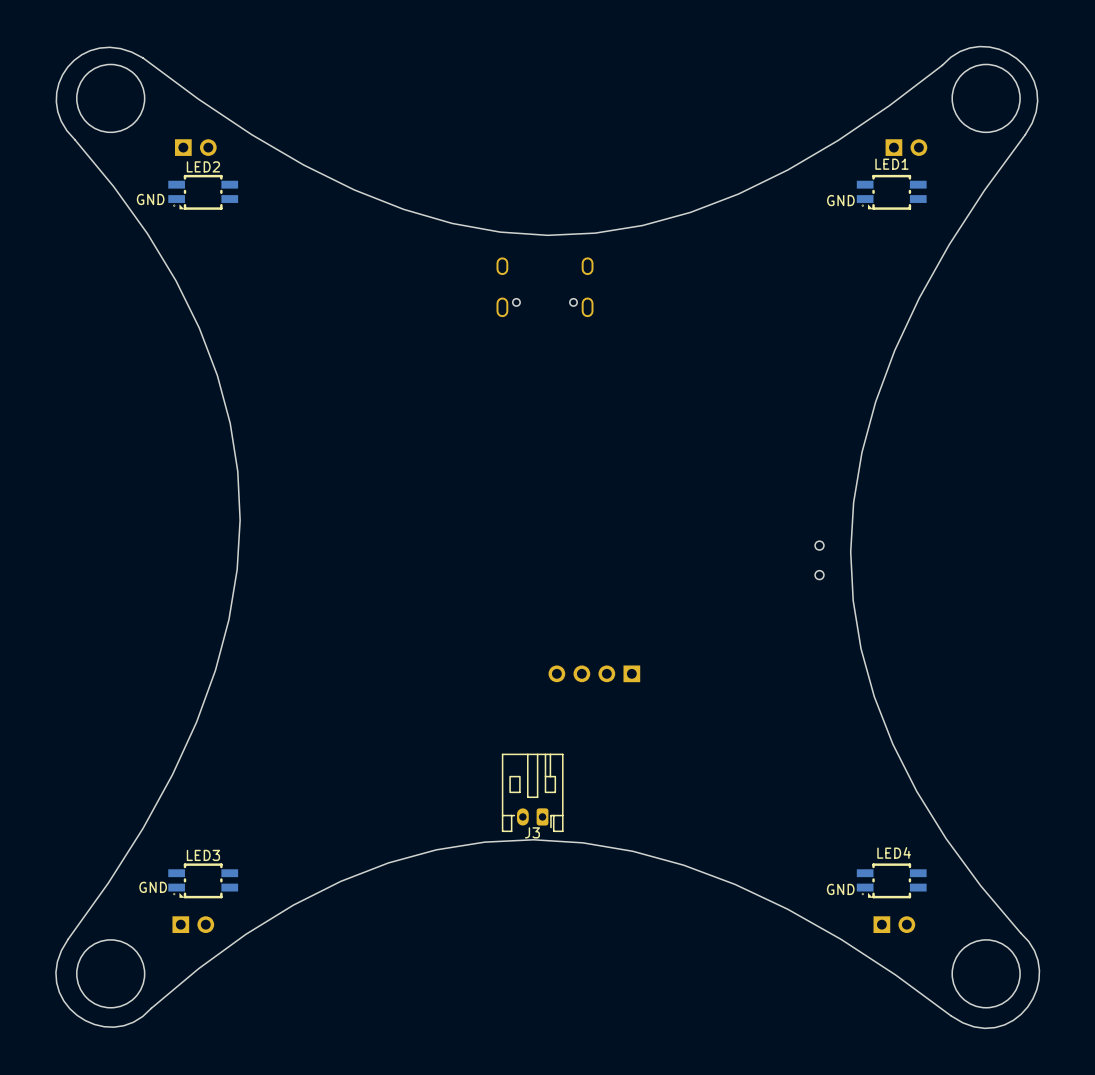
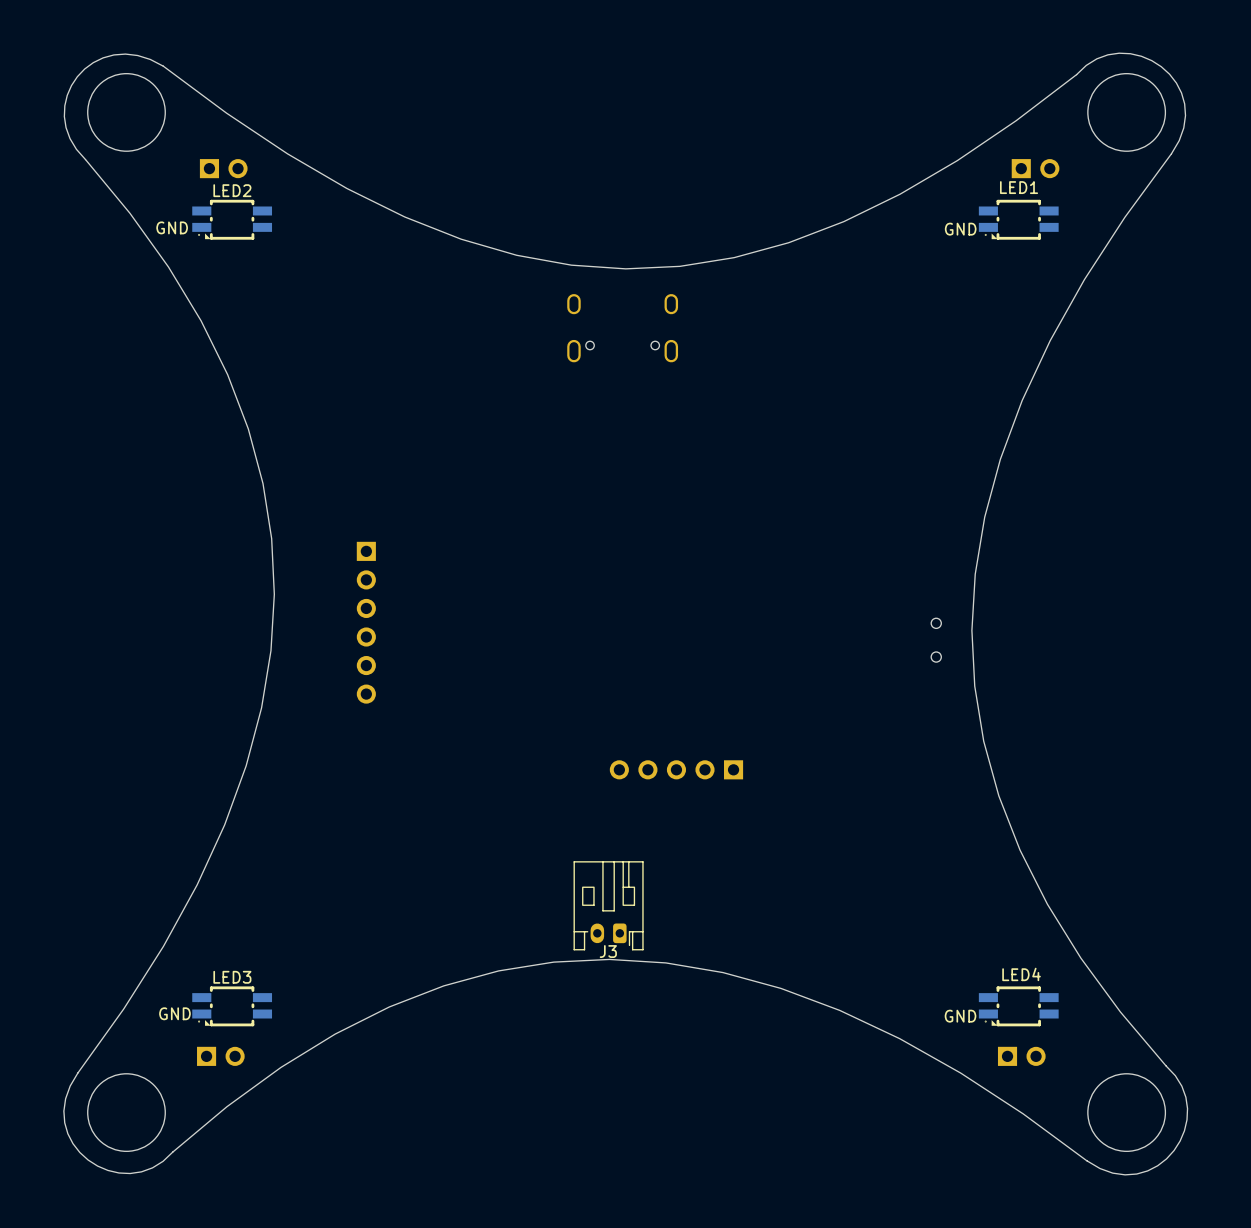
part: none -> (366, 622)
part footprint: [548, 665, 641, 683] -> [609, 760, 744, 780]

